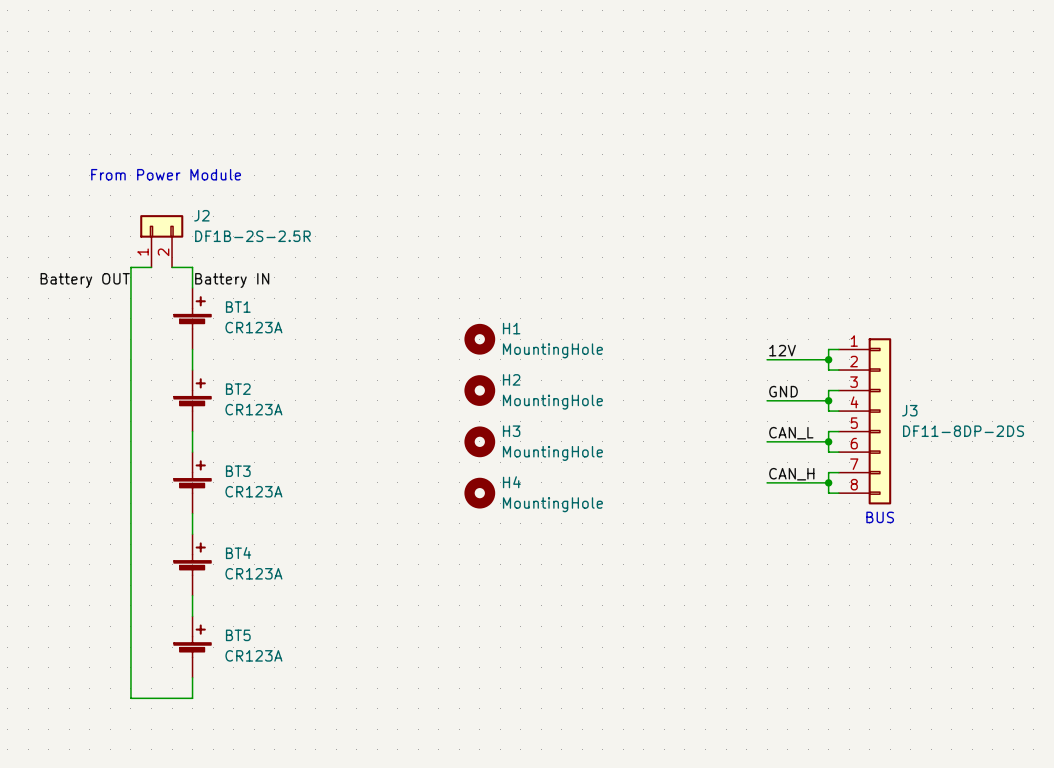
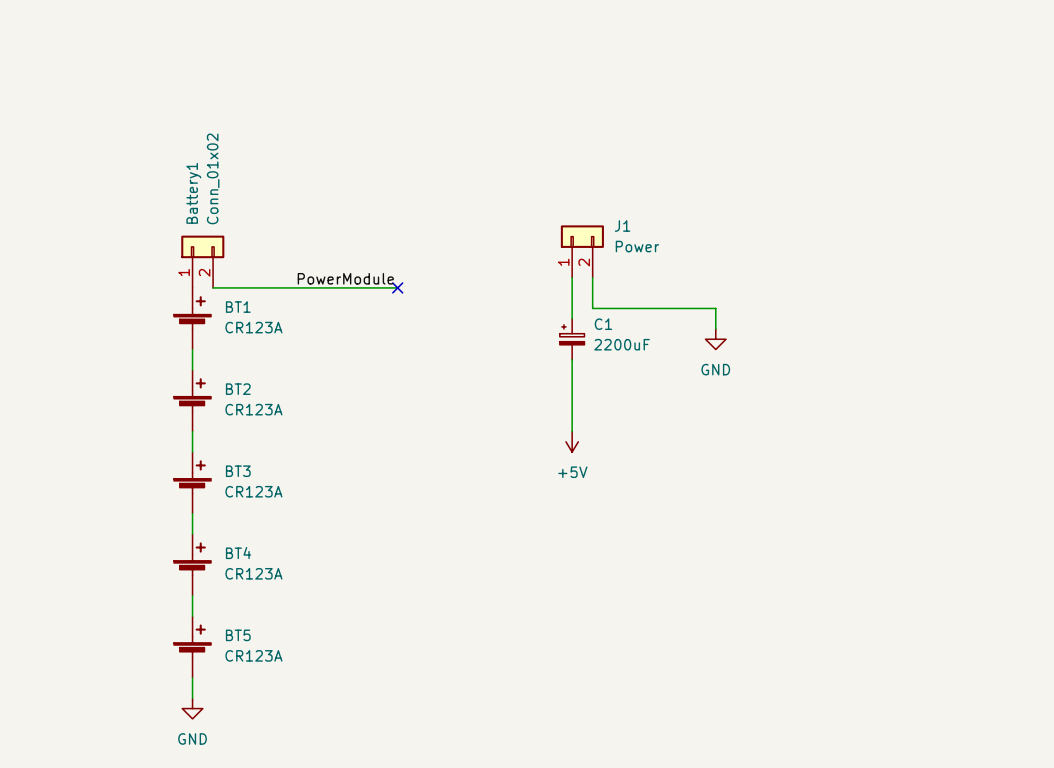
text: From Power Module (166, 174) -> none
J2: DF1B-2S-2.5R (161, 241) -> none
J1: none -> Power (582, 251)
Battery1: none -> Conn_01x02 (202, 261)
wire: (151, 267) (130, 267) (130, 698) (192, 698) -> none
wire: (172, 267) (192, 267) (192, 287) -> none
wire: none -> (572, 277) (572, 318)
wire: none -> (592, 277) (592, 308) (715, 308) (715, 328)
label: none -> PowerModule (345, 278)
label: Battery OUT (85, 280) -> none
label: Battery IN (232, 280) -> none
wire: none -> (213, 287) (397, 287)
no-connect mark: none -> (397, 287)
H1: MountingHole (479, 339) -> none
C1: none -> 2200uF (572, 339)
power symbol: none -> GND (715, 339)
wire: (838, 349) (828, 349) (828, 370) (838, 370) -> none
label: 12V (782, 350) -> none
wire: none -> (572, 359) (572, 431)
wire: (767, 359) (828, 359) -> none
junction: (828, 359) -> none
H2: MountingHole (479, 390) -> none
wire: (838, 390) (828, 390) (828, 411) (838, 411) -> none
label: GND (783, 391) -> none
wire: (767, 400) (828, 400) -> none
junction: (828, 400) -> none
J3: DF11-8DP-2DS (865, 421) -> none
wire: (838, 431) (828, 431) (828, 452) (838, 452) -> none
label: CAN_L (791, 433) -> none
H3: MountingHole (479, 441) -> none
power symbol: none -> +5V (572, 441)
wire: (767, 441) (828, 441) -> none
junction: (828, 441) -> none
wire: (838, 472) (828, 472) (828, 493) (838, 493) -> none
label: CAN_H (791, 474) -> none
wire: (767, 482) (828, 482) -> none
junction: (828, 482) -> none
H4: MountingHole (479, 493) -> none
text: BUS (880, 517) -> none
power symbol: none -> GND (192, 708)

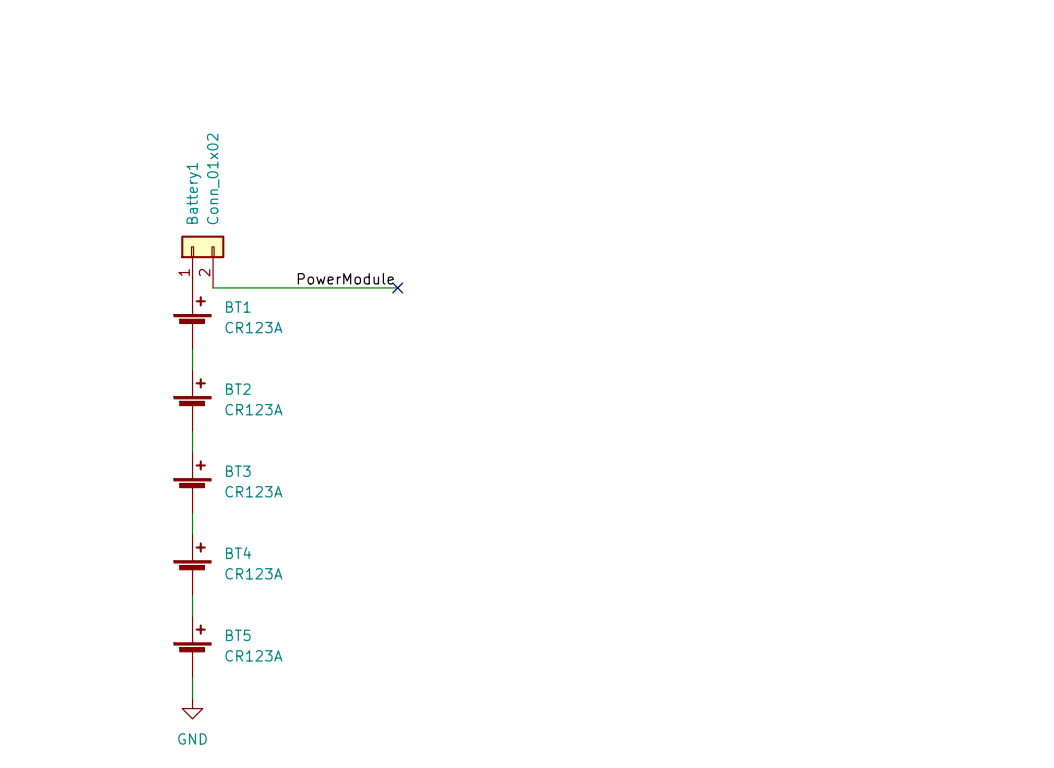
J1: Power (582, 251) -> none
wire: (572, 277) (572, 318) -> none
wire: (592, 277) (592, 308) (715, 308) (715, 328) -> none
C1: 2200uF (572, 339) -> none
power symbol: GND (715, 339) -> none
wire: (572, 359) (572, 431) -> none
power symbol: +5V (572, 441) -> none

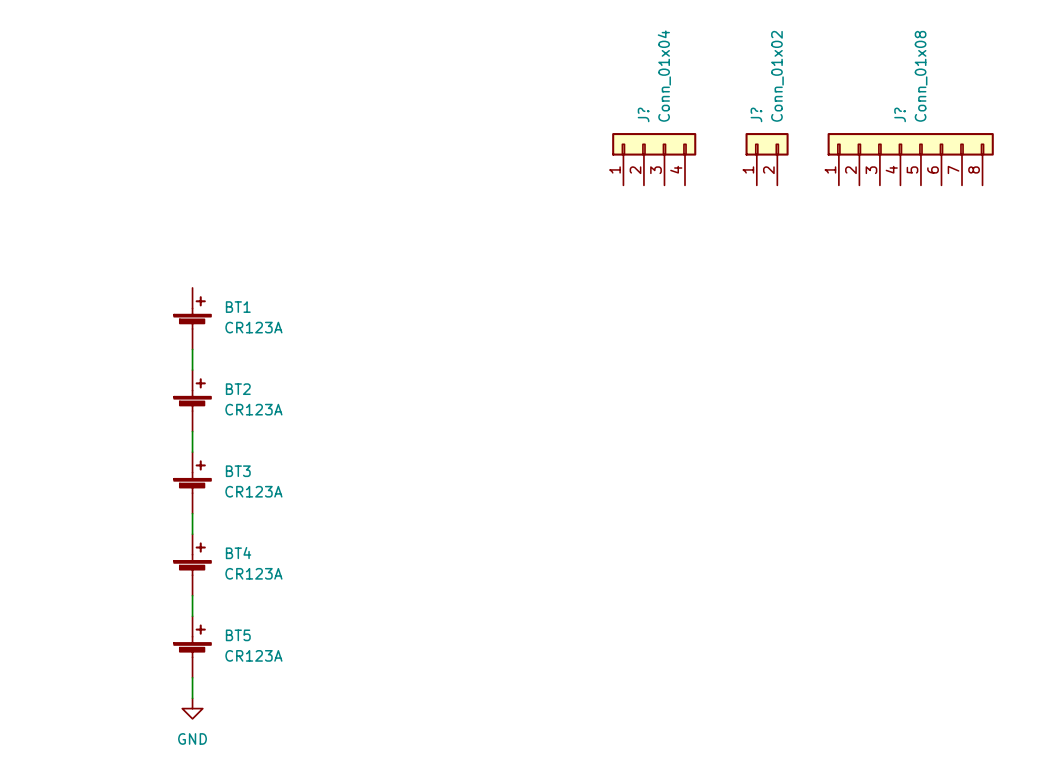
J?: none -> Conn_01x04 (654, 159)
J?: none -> Conn_01x02 (767, 159)
J?: none -> Conn_01x08 (910, 159)
Battery1: Conn_01x02 (202, 261) -> none
label: PowerModule (345, 278) -> none
wire: (213, 287) (397, 287) -> none
no-connect mark: (397, 287) -> none

